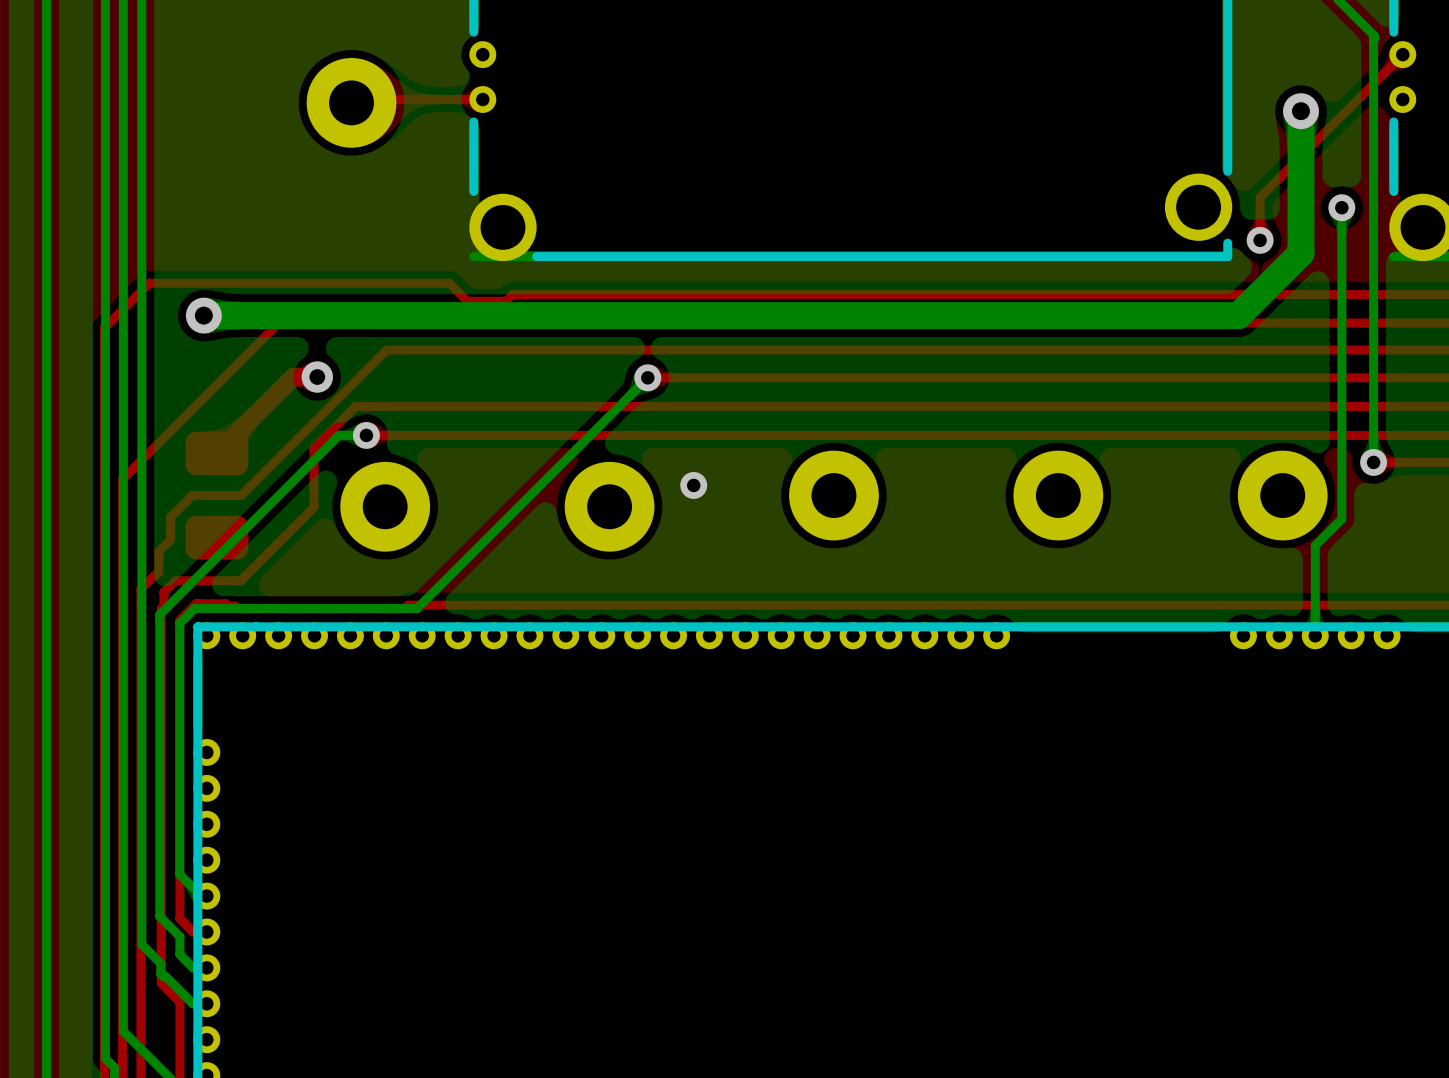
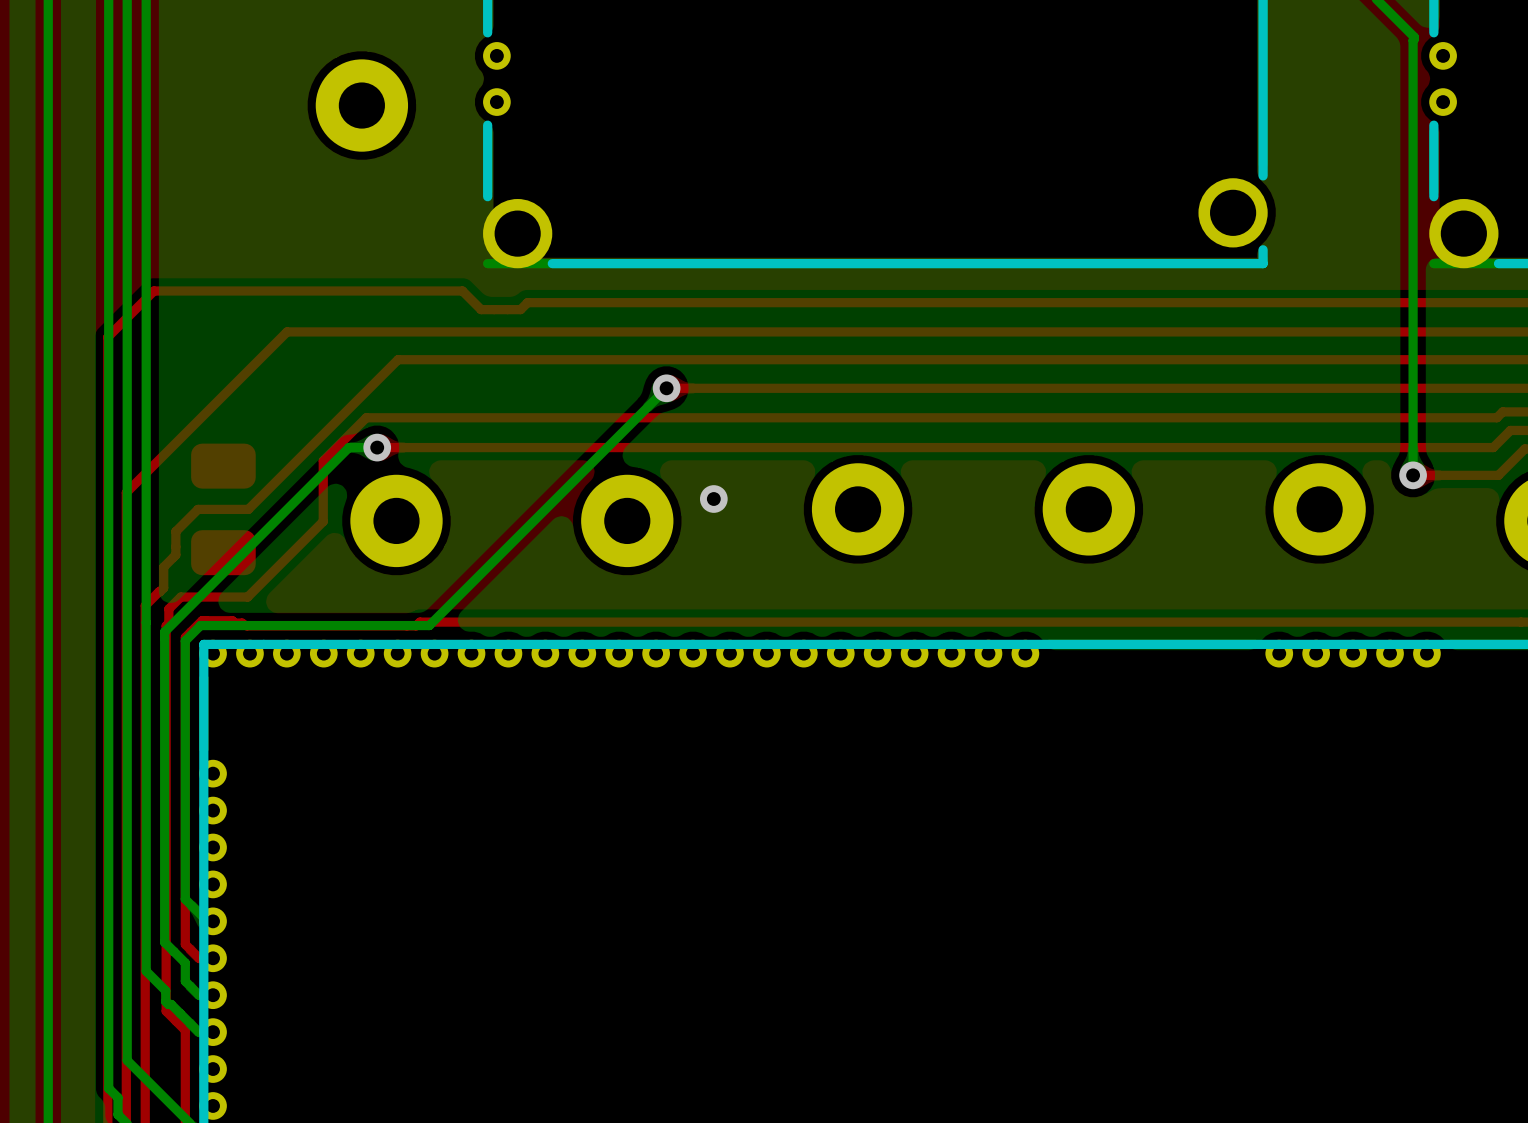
top track: (1402, 54) (1260, 197) (1260, 240) -> none
top track: (482, 99) (354, 99) (351, 102) -> none
bottom track: (1300, 111) (1300, 253) (1238, 315) (203, 315) -> none
via: (1300, 111) -> none
bottom track: (1341, 207) (1341, 519) (1315, 545) (1315, 635) -> none
via: (1341, 207) -> none
via: (1260, 240) -> none
via: (203, 315) -> none
top track: (317, 377) (293, 377) (216, 453) -> none
via: (317, 377) -> none

